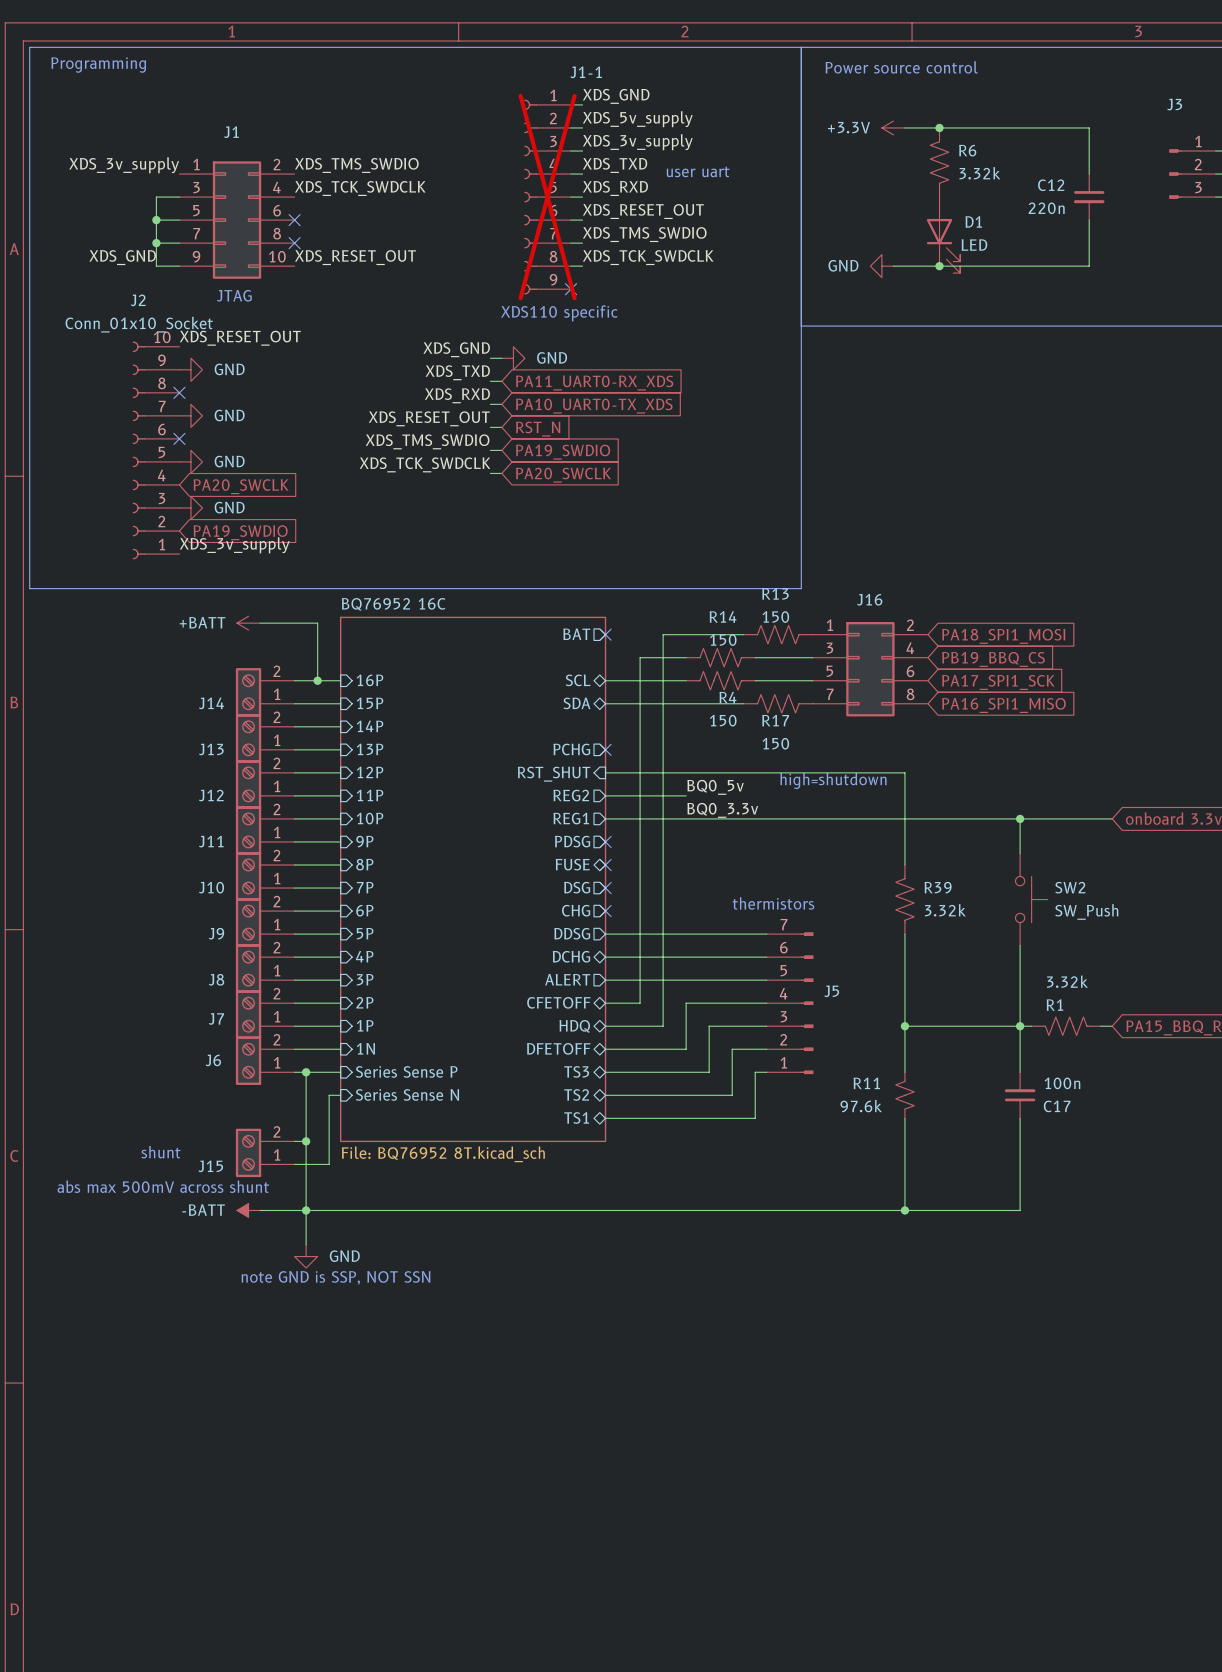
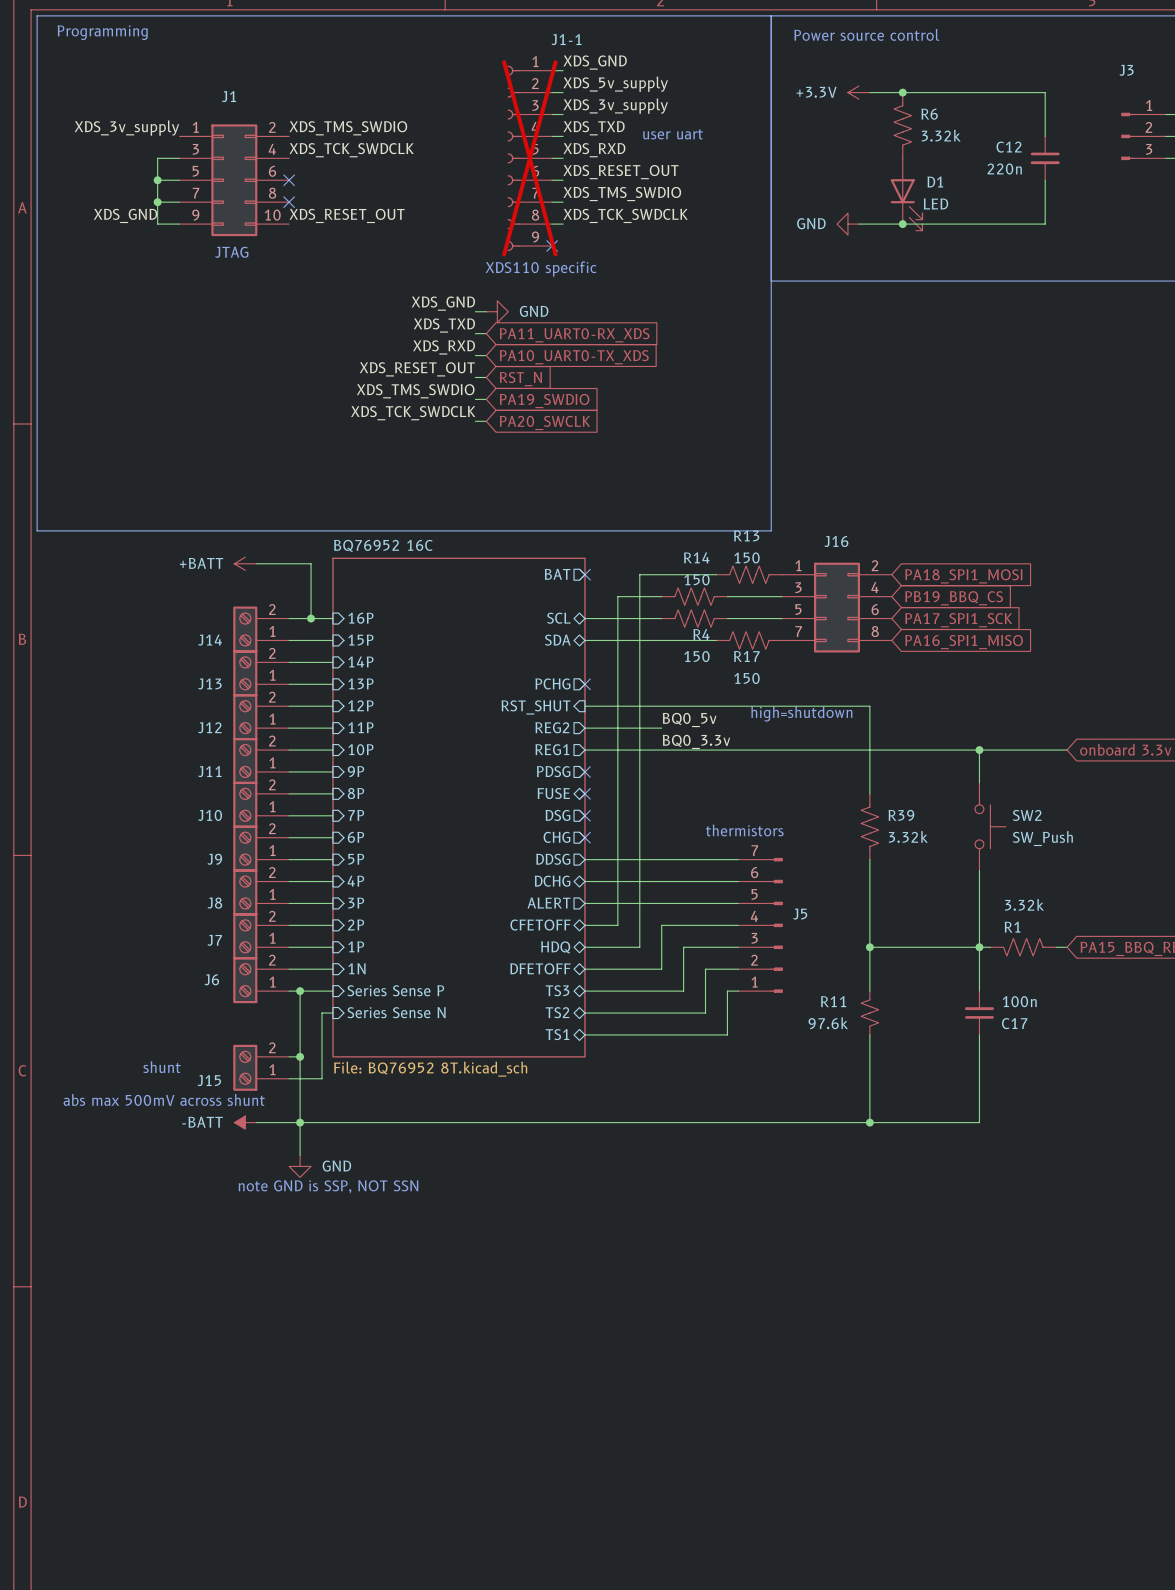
label: XDS_RESET_OUT (240, 338) -> none
power symbol: GND (190, 369) -> none
no-connect mark: (179, 392) -> none
power symbol: GND (190, 415) -> none
no-connect mark: (179, 438) -> none
J2: Conn_01x10_Socket (156, 450) -> none
power symbol: GND (190, 461) -> none
global label: PA20_SWCLK (241, 486) -> none
power symbol: GND (190, 508) -> none
global label: PA19_SWDIO (240, 532) -> none
label: XDS_3v_supply (234, 545) -> none

